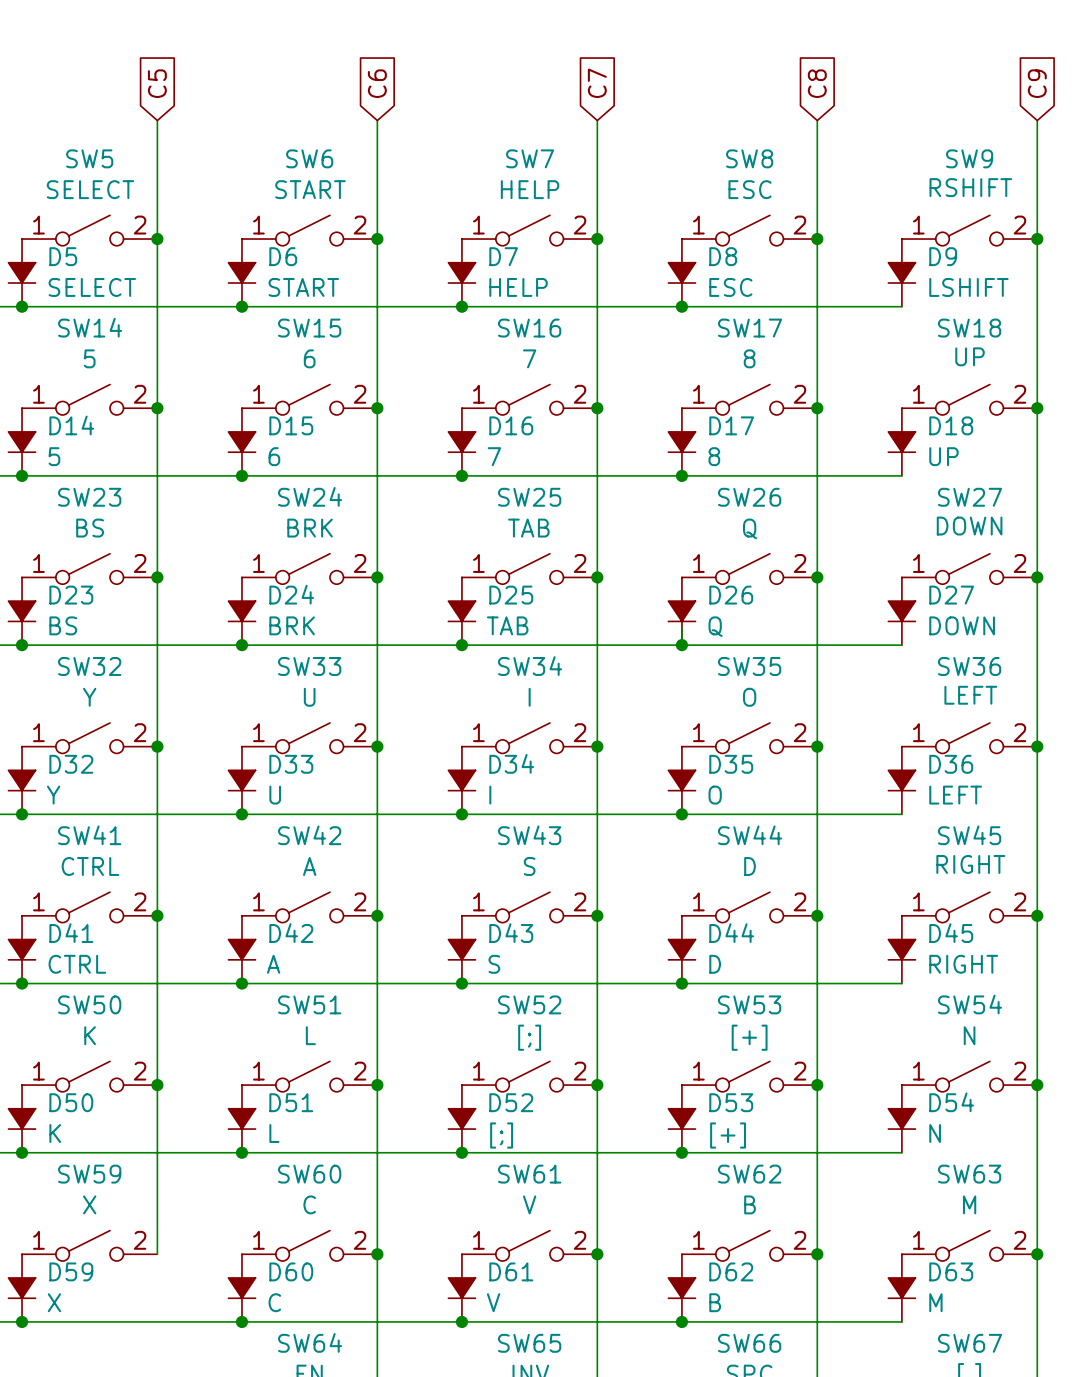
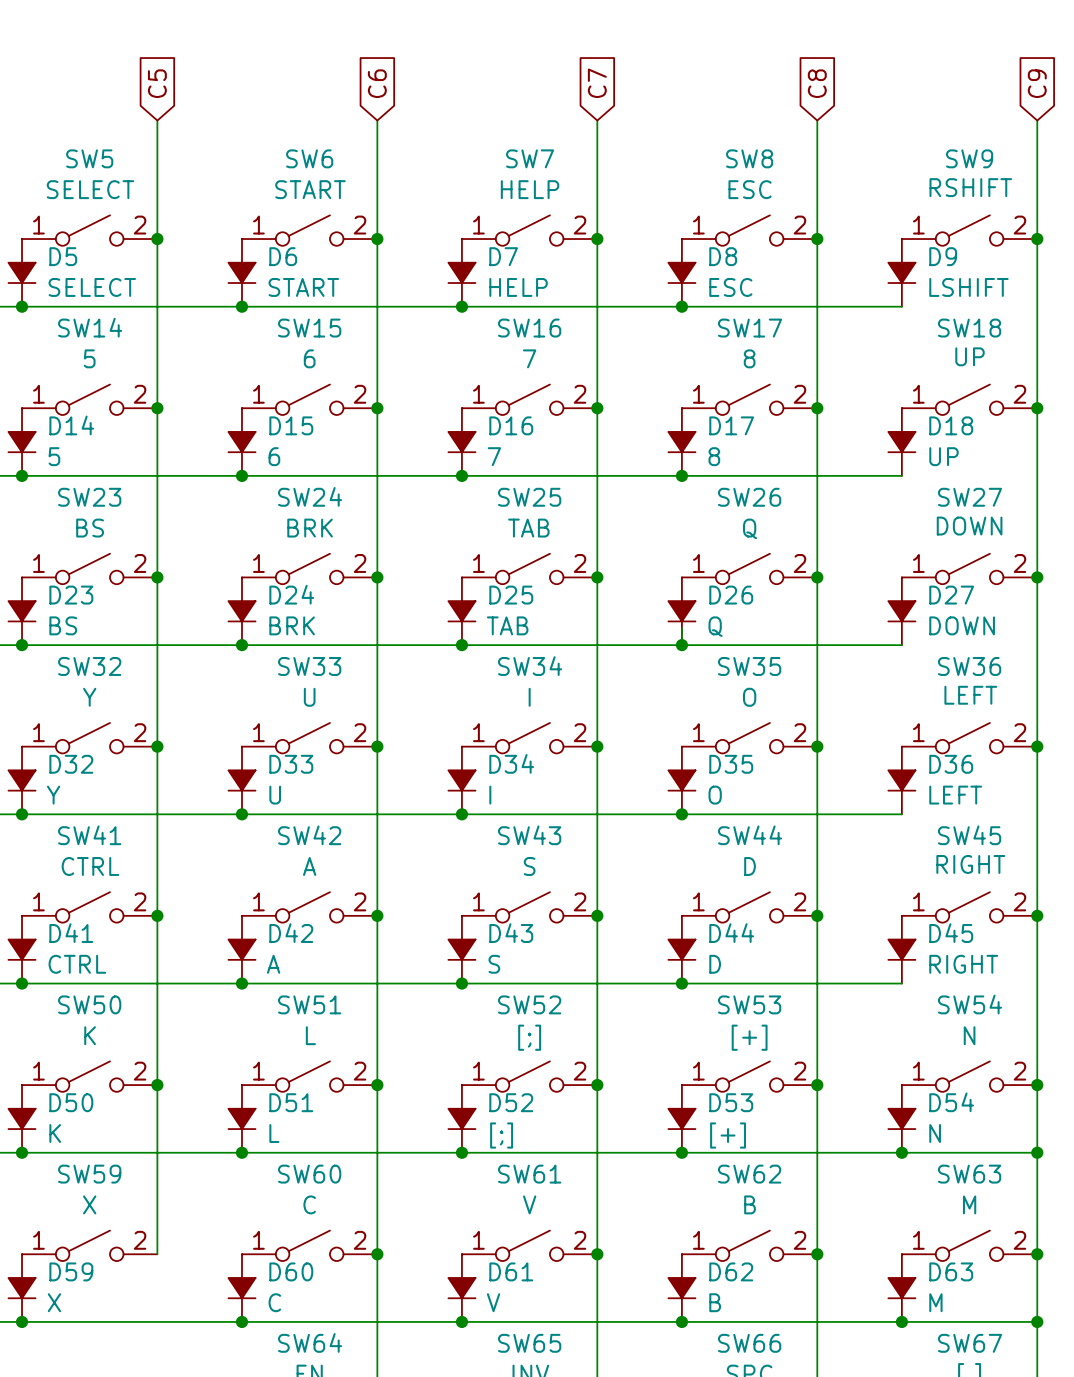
wire: none -> (901, 1152) (1037, 1152)
junction: none -> (901, 1152)
junction: none -> (1037, 1152)
wire: none -> (901, 1321) (1037, 1321)
junction: none -> (901, 1321)
junction: none -> (1037, 1321)

